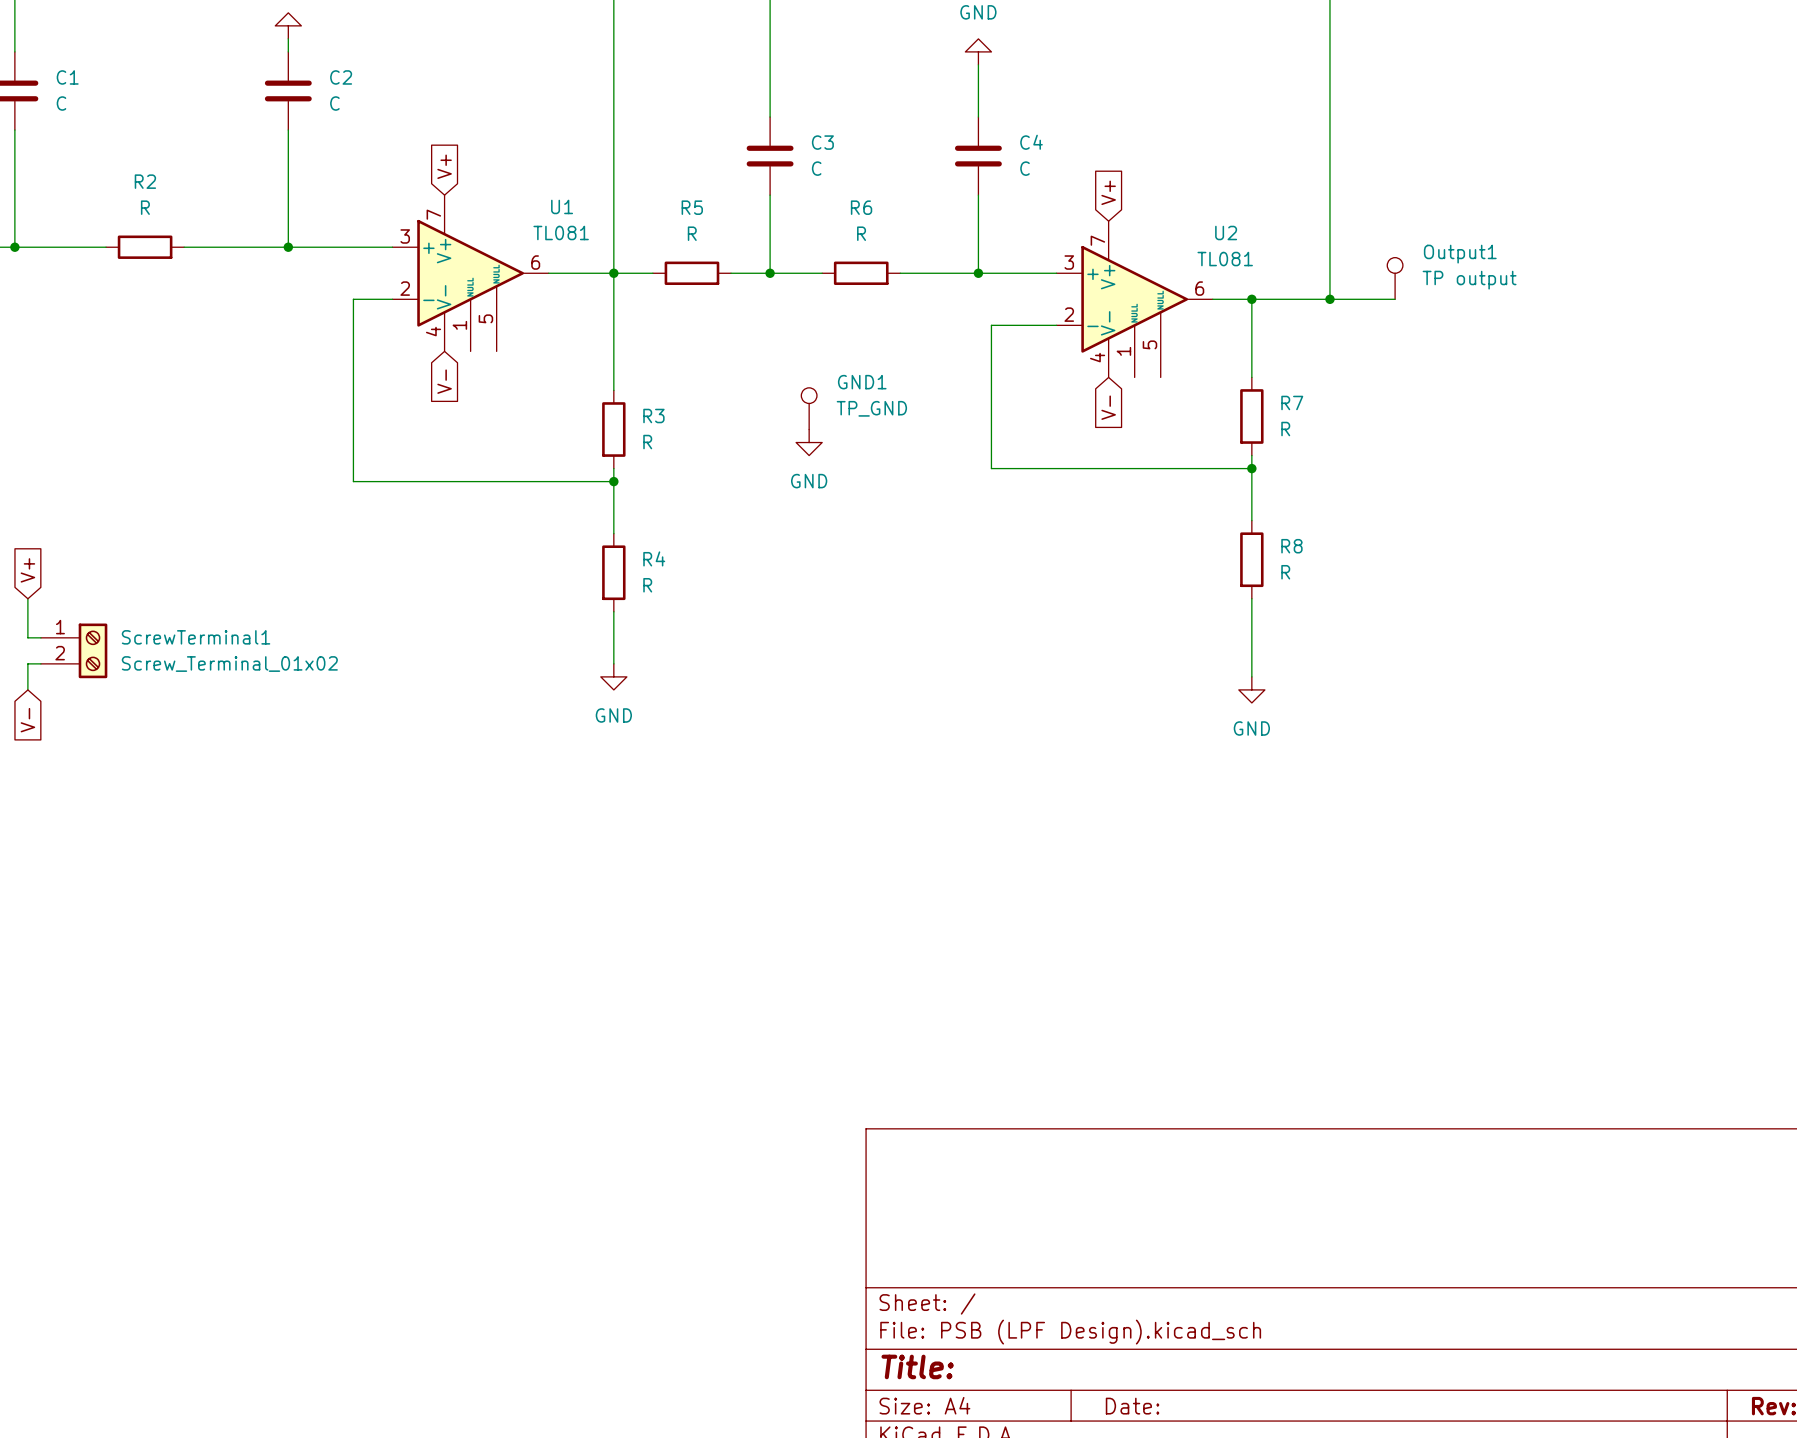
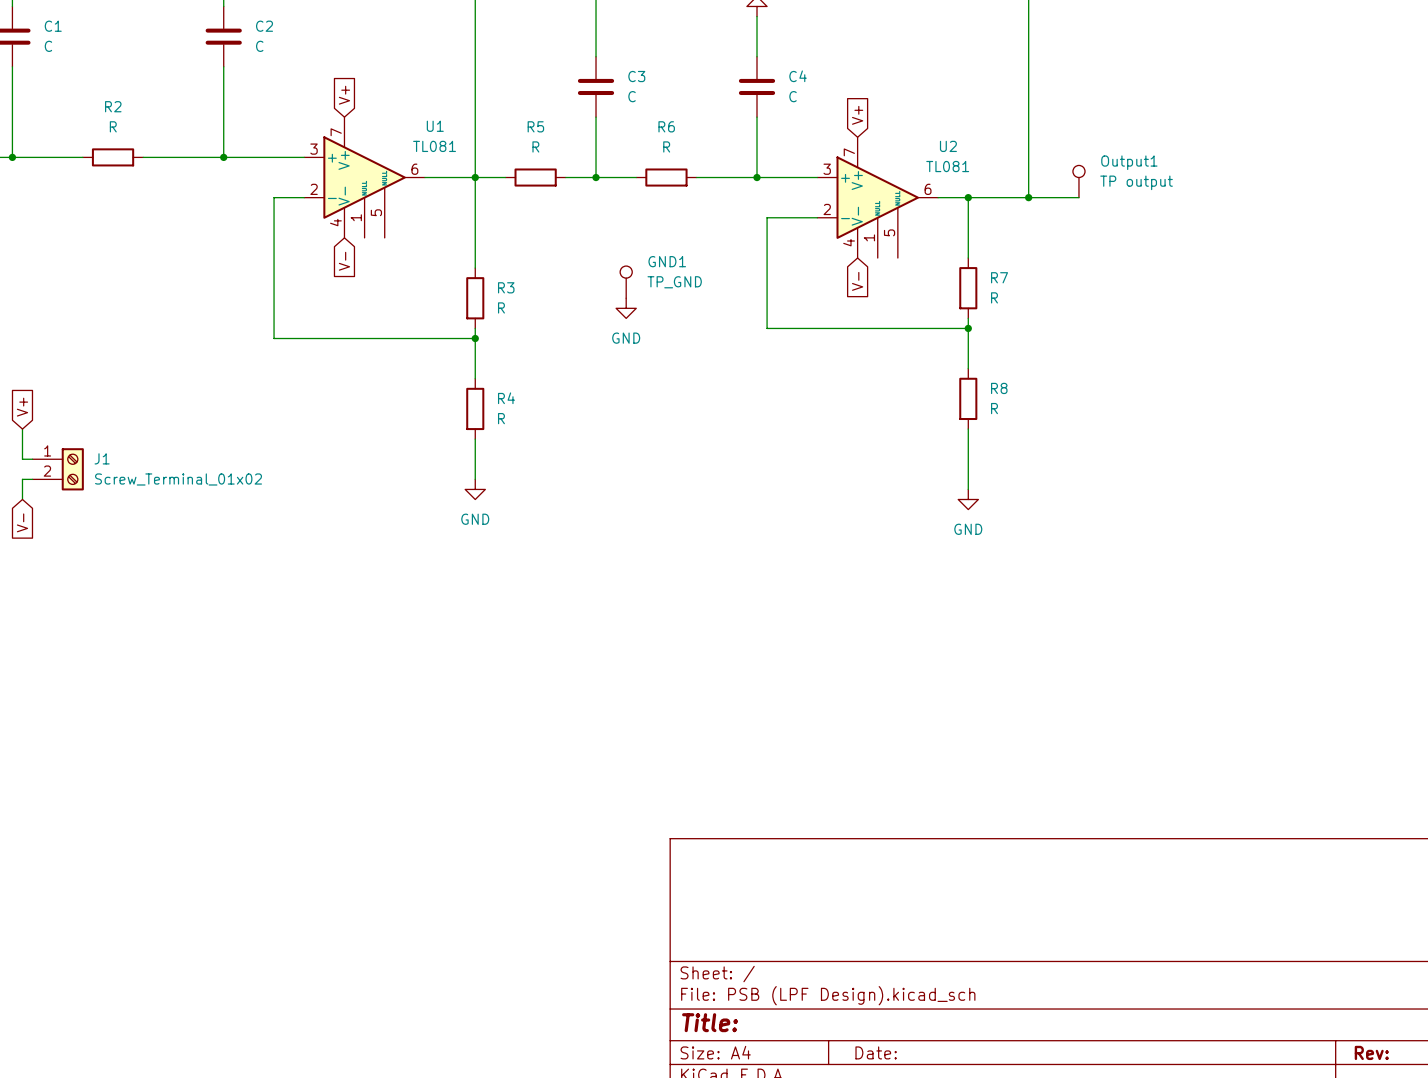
ScrewTerminal1 name: ScrewTerminal1 (196, 637) -> J1 (102, 458)

